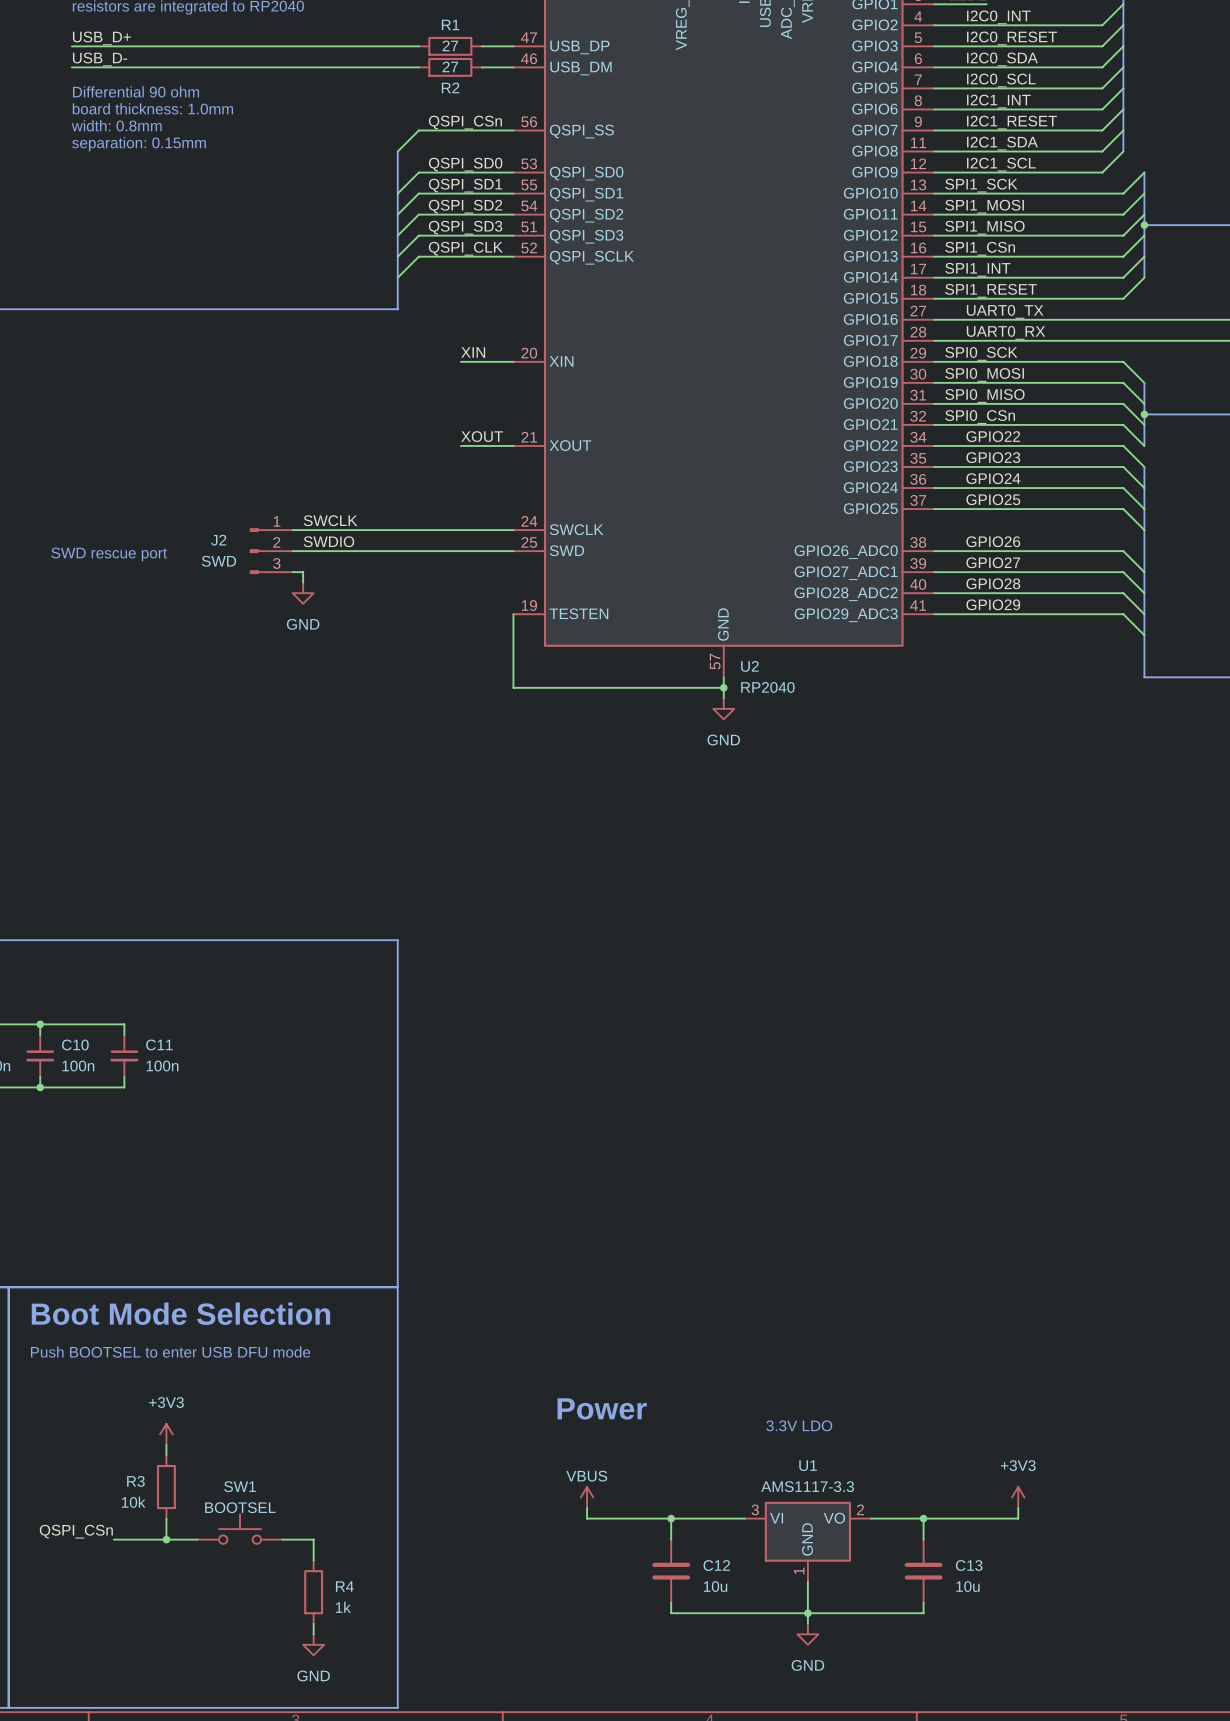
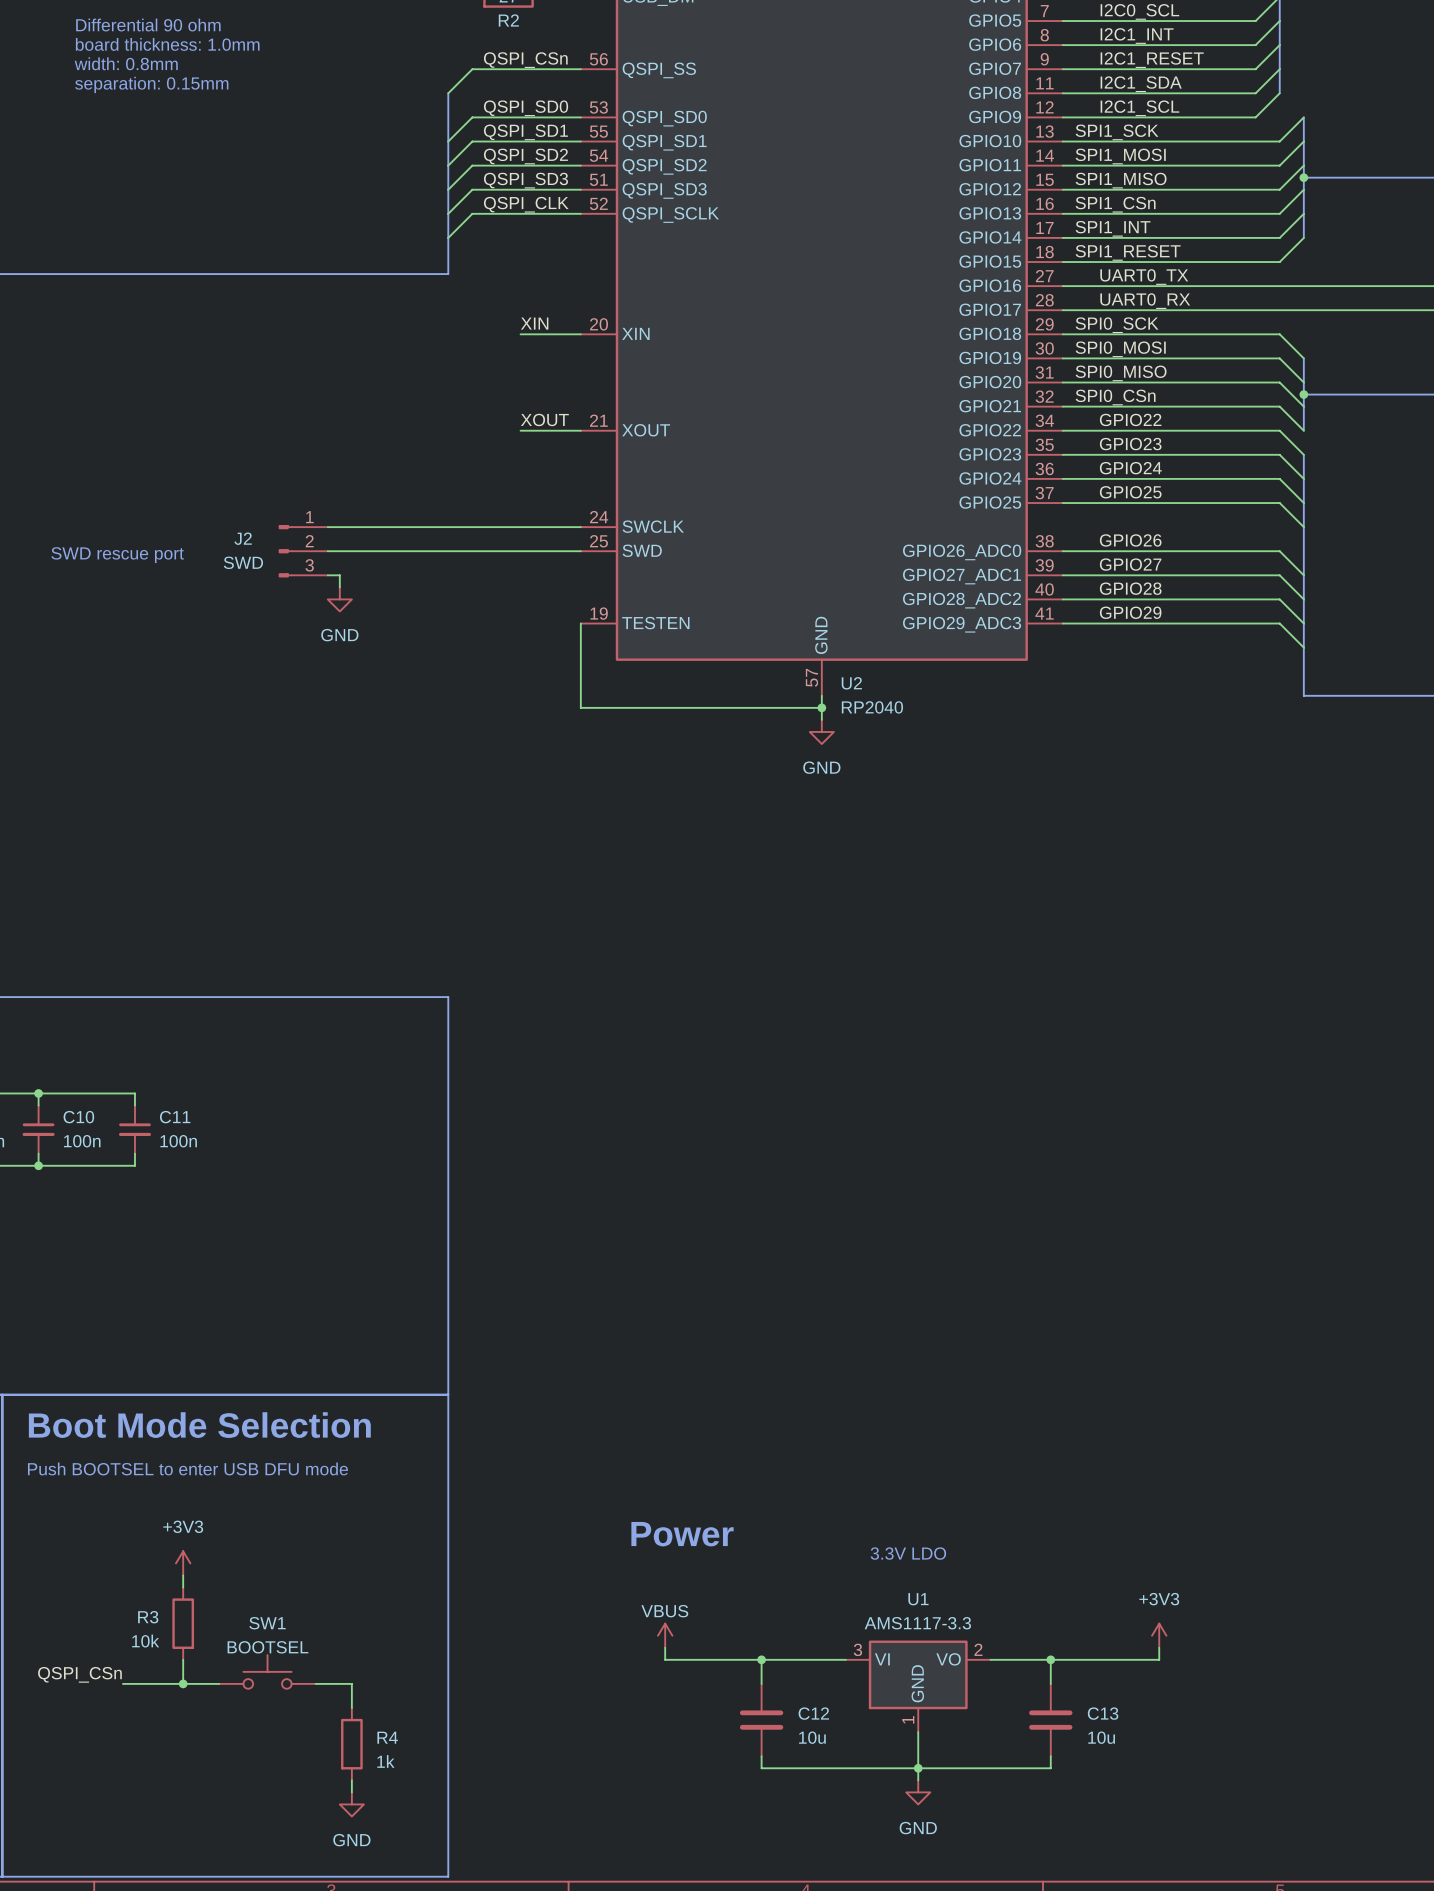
label: SWCLK (330, 520) -> none
label: SWDIO (329, 541) -> none

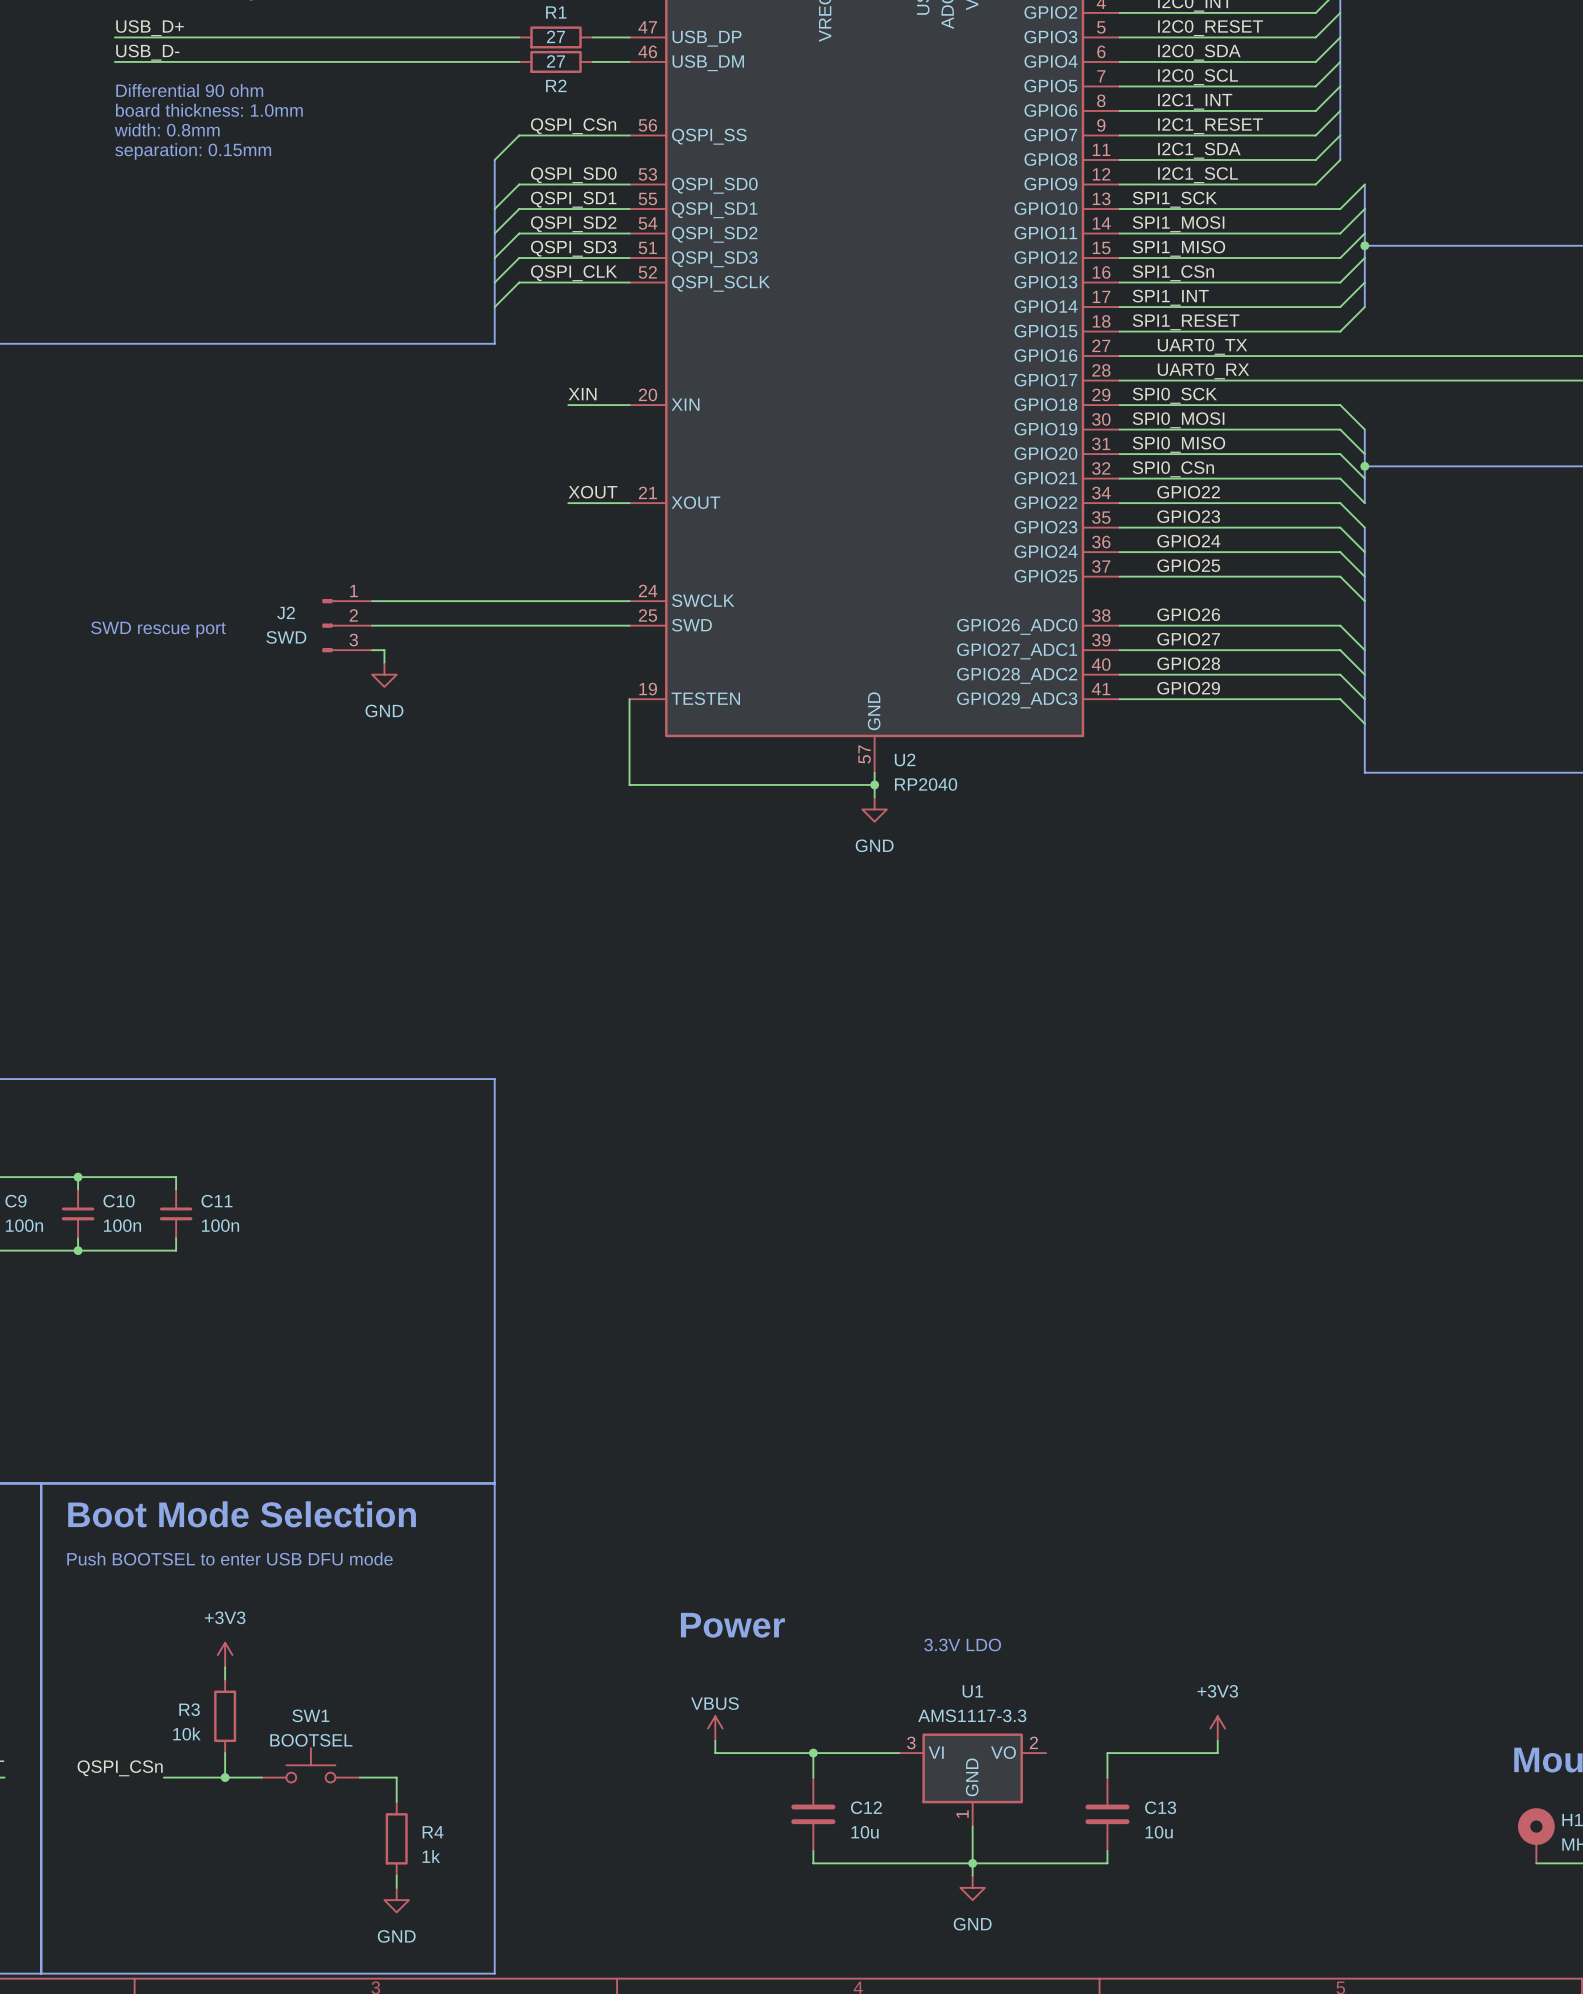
wire: (990, 1659) (1050, 1659) -> none
junction: (1050, 1659) -> none

